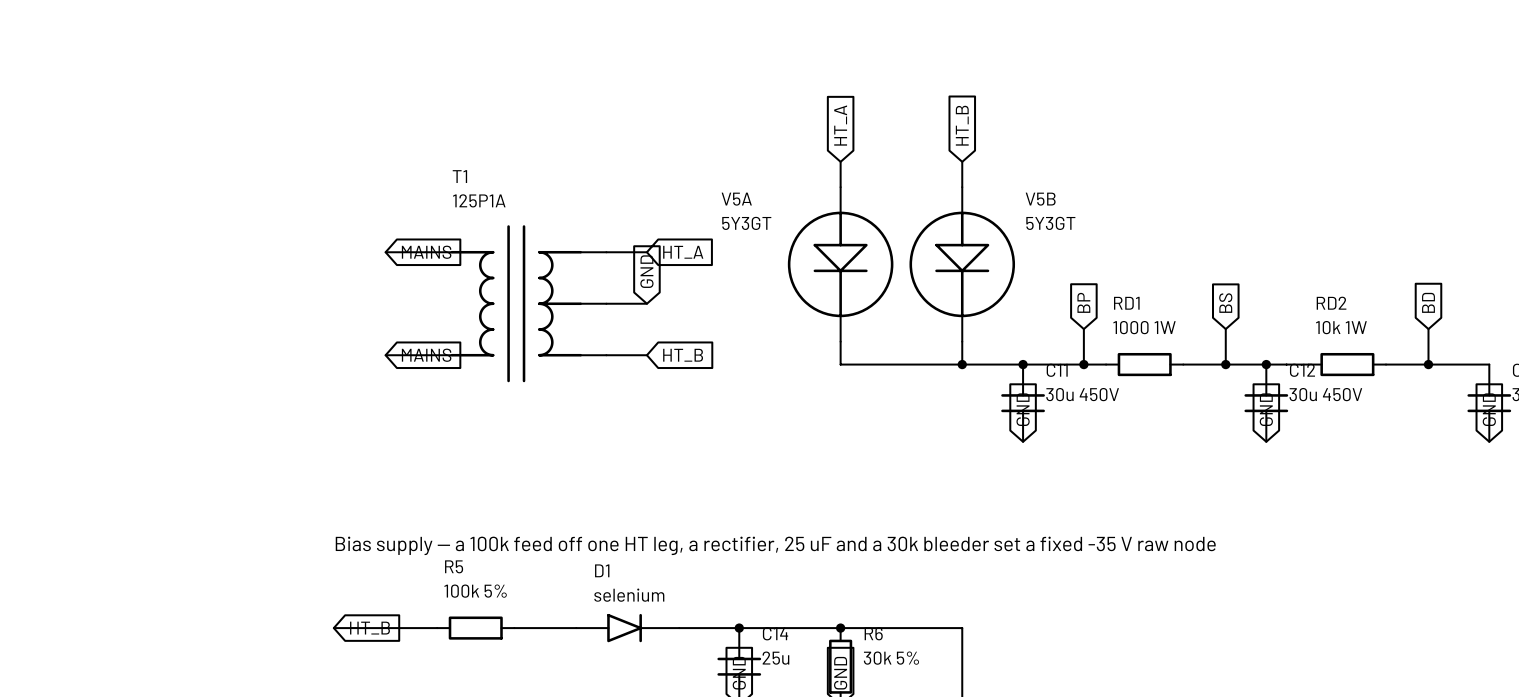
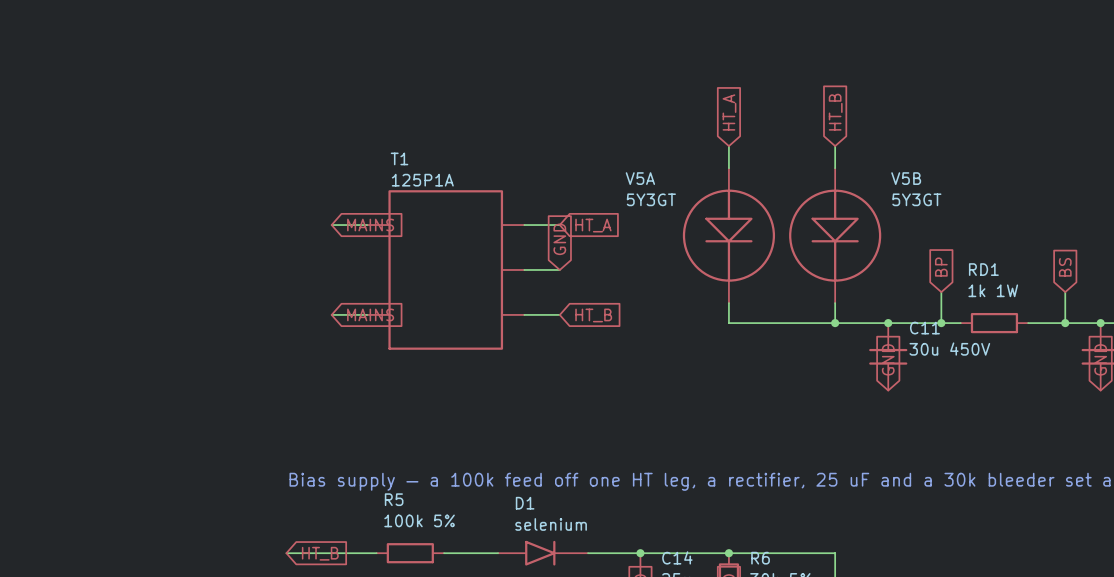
T1 symbol: [426, 225, 607, 383] -> [367, 190, 525, 350]
RD1 value: 1000 1W (1144, 327) -> 1k 1W (993, 290)

